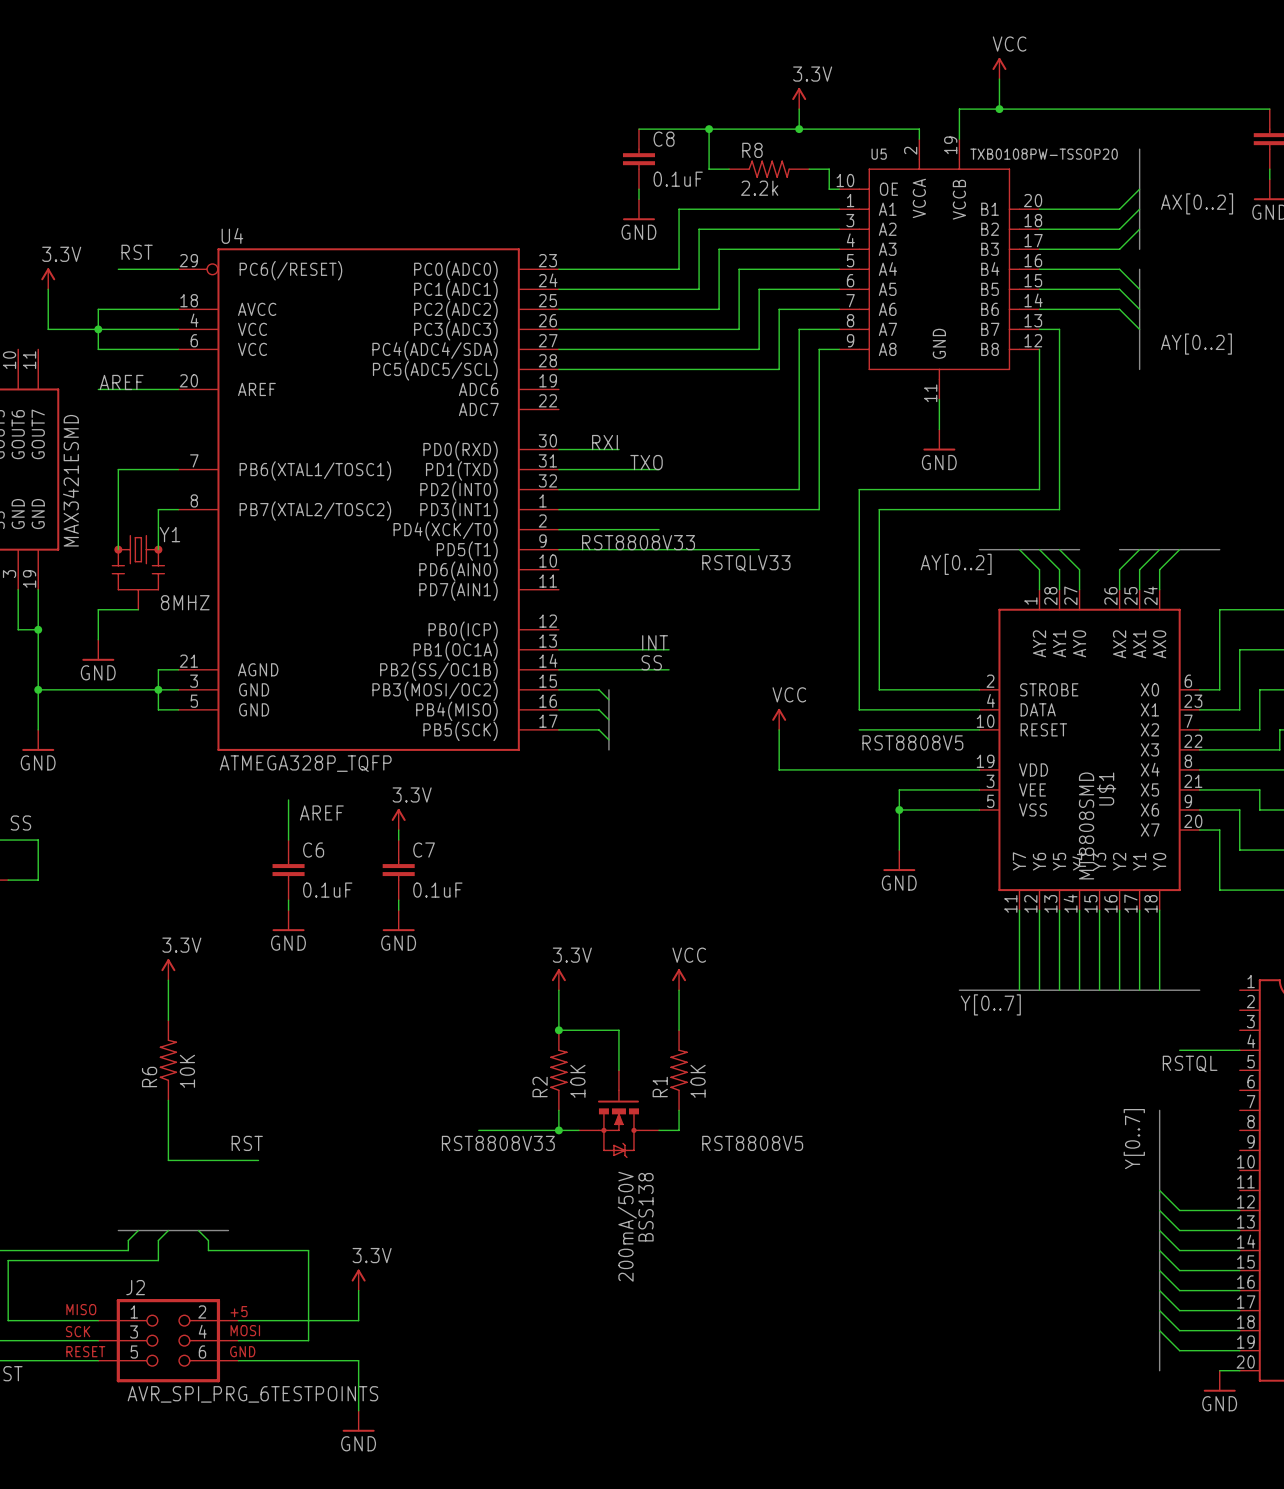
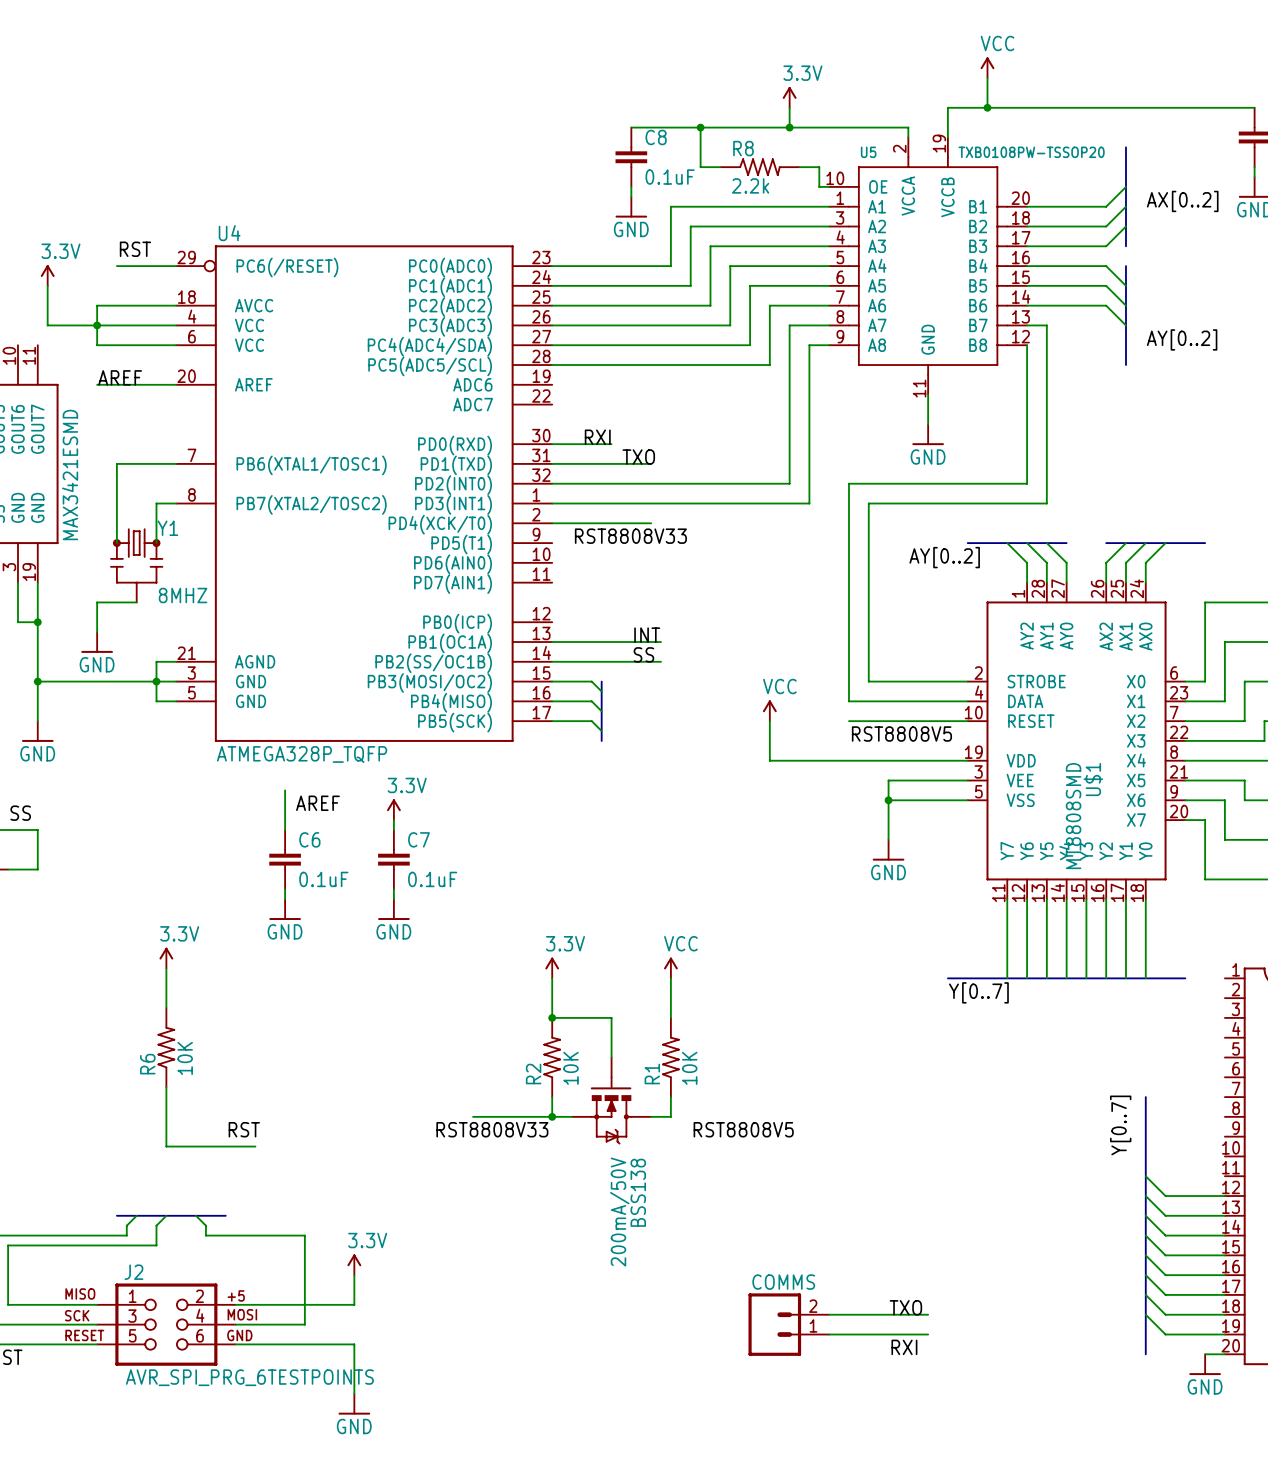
wire: (558, 549) (759, 549) -> none
label: RSTQLV33 (746, 563) -> none
wire: (1179, 1050) (1239, 1050) -> none
label: RSTQL (1190, 1063) -> none
label: none -> TXO (905, 1307)
wire: none -> (829, 1314) (928, 1314)
COMMS: none -> (788, 1324)
wire: none -> (829, 1334) (928, 1334)
label: none -> RXI (904, 1347)

